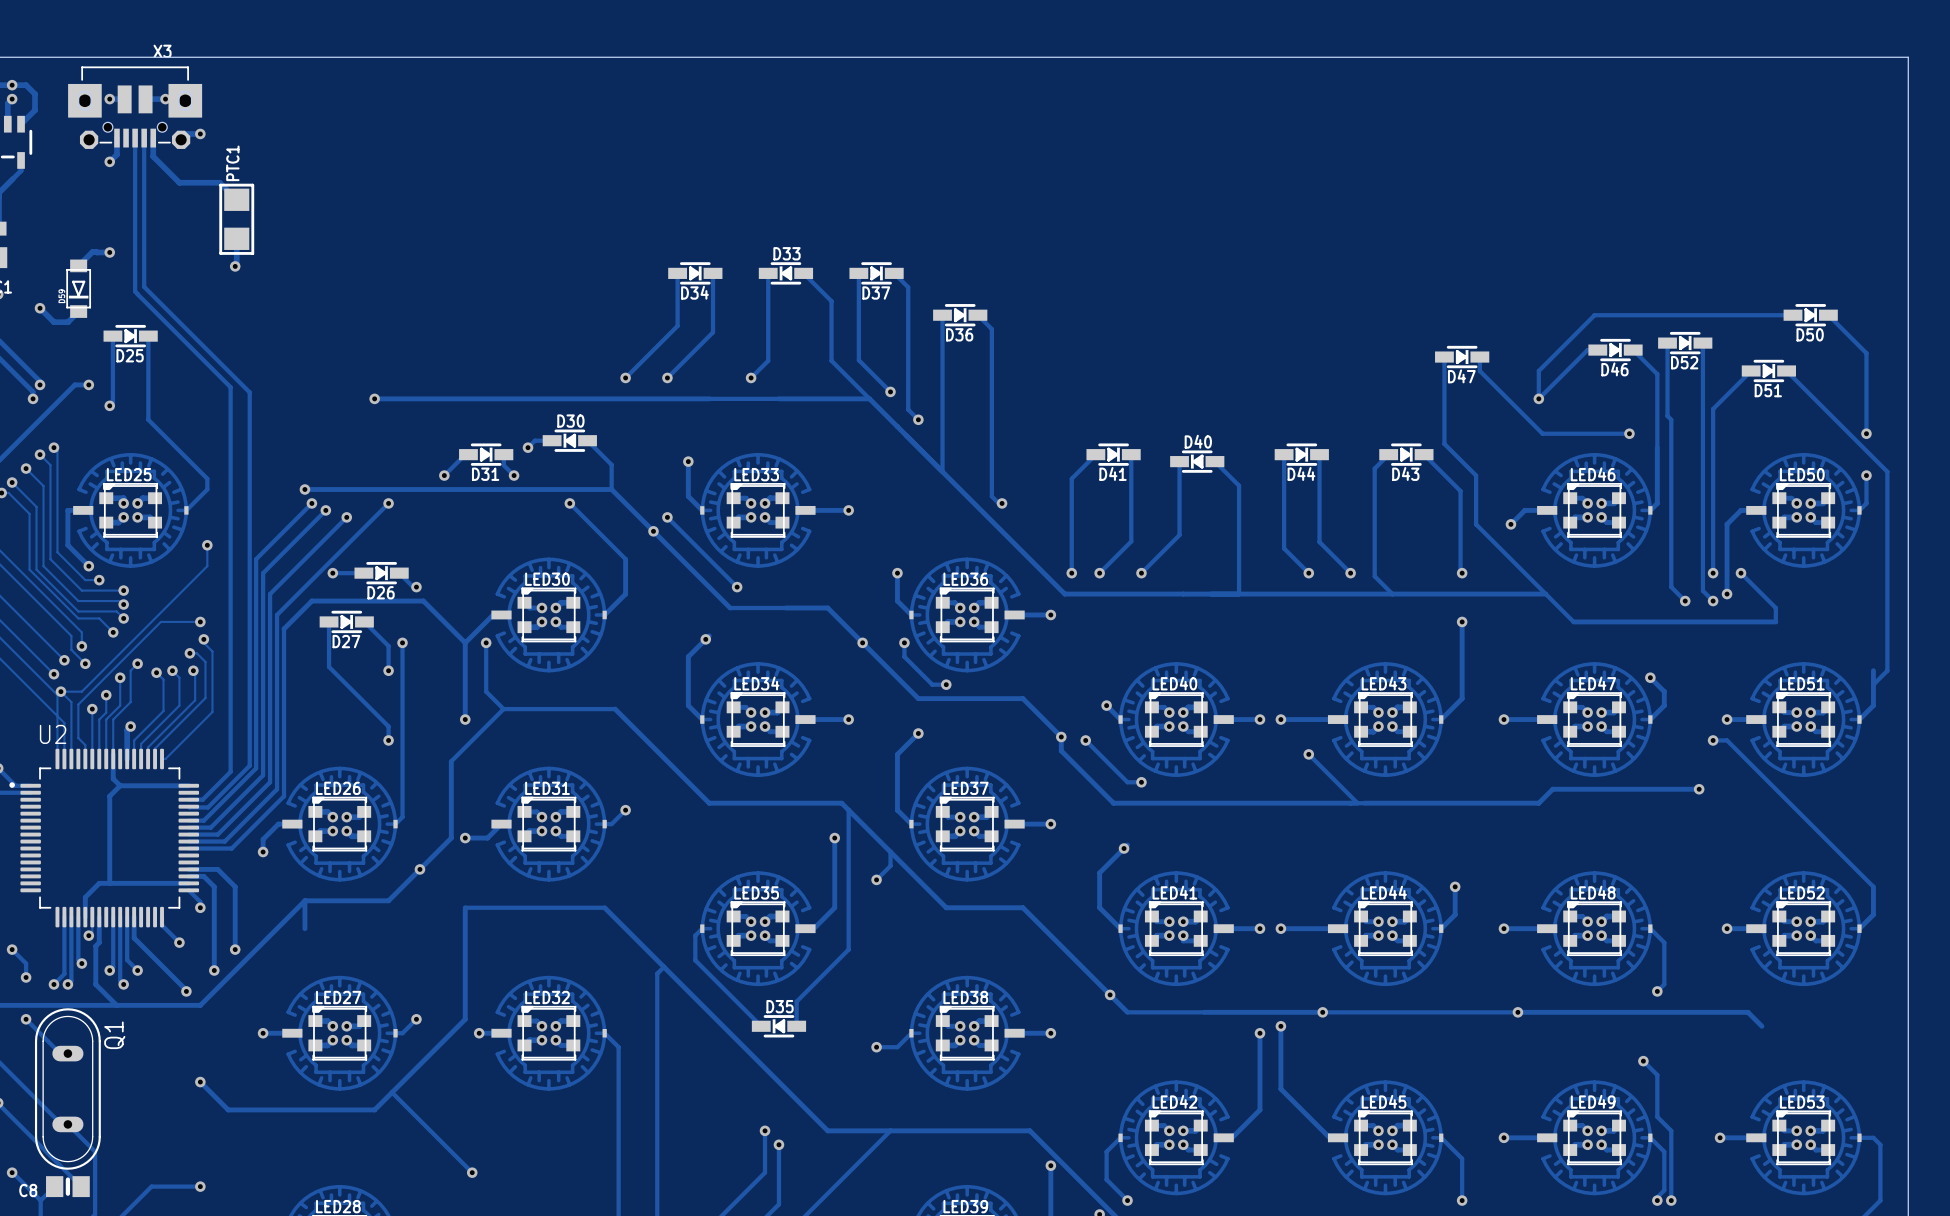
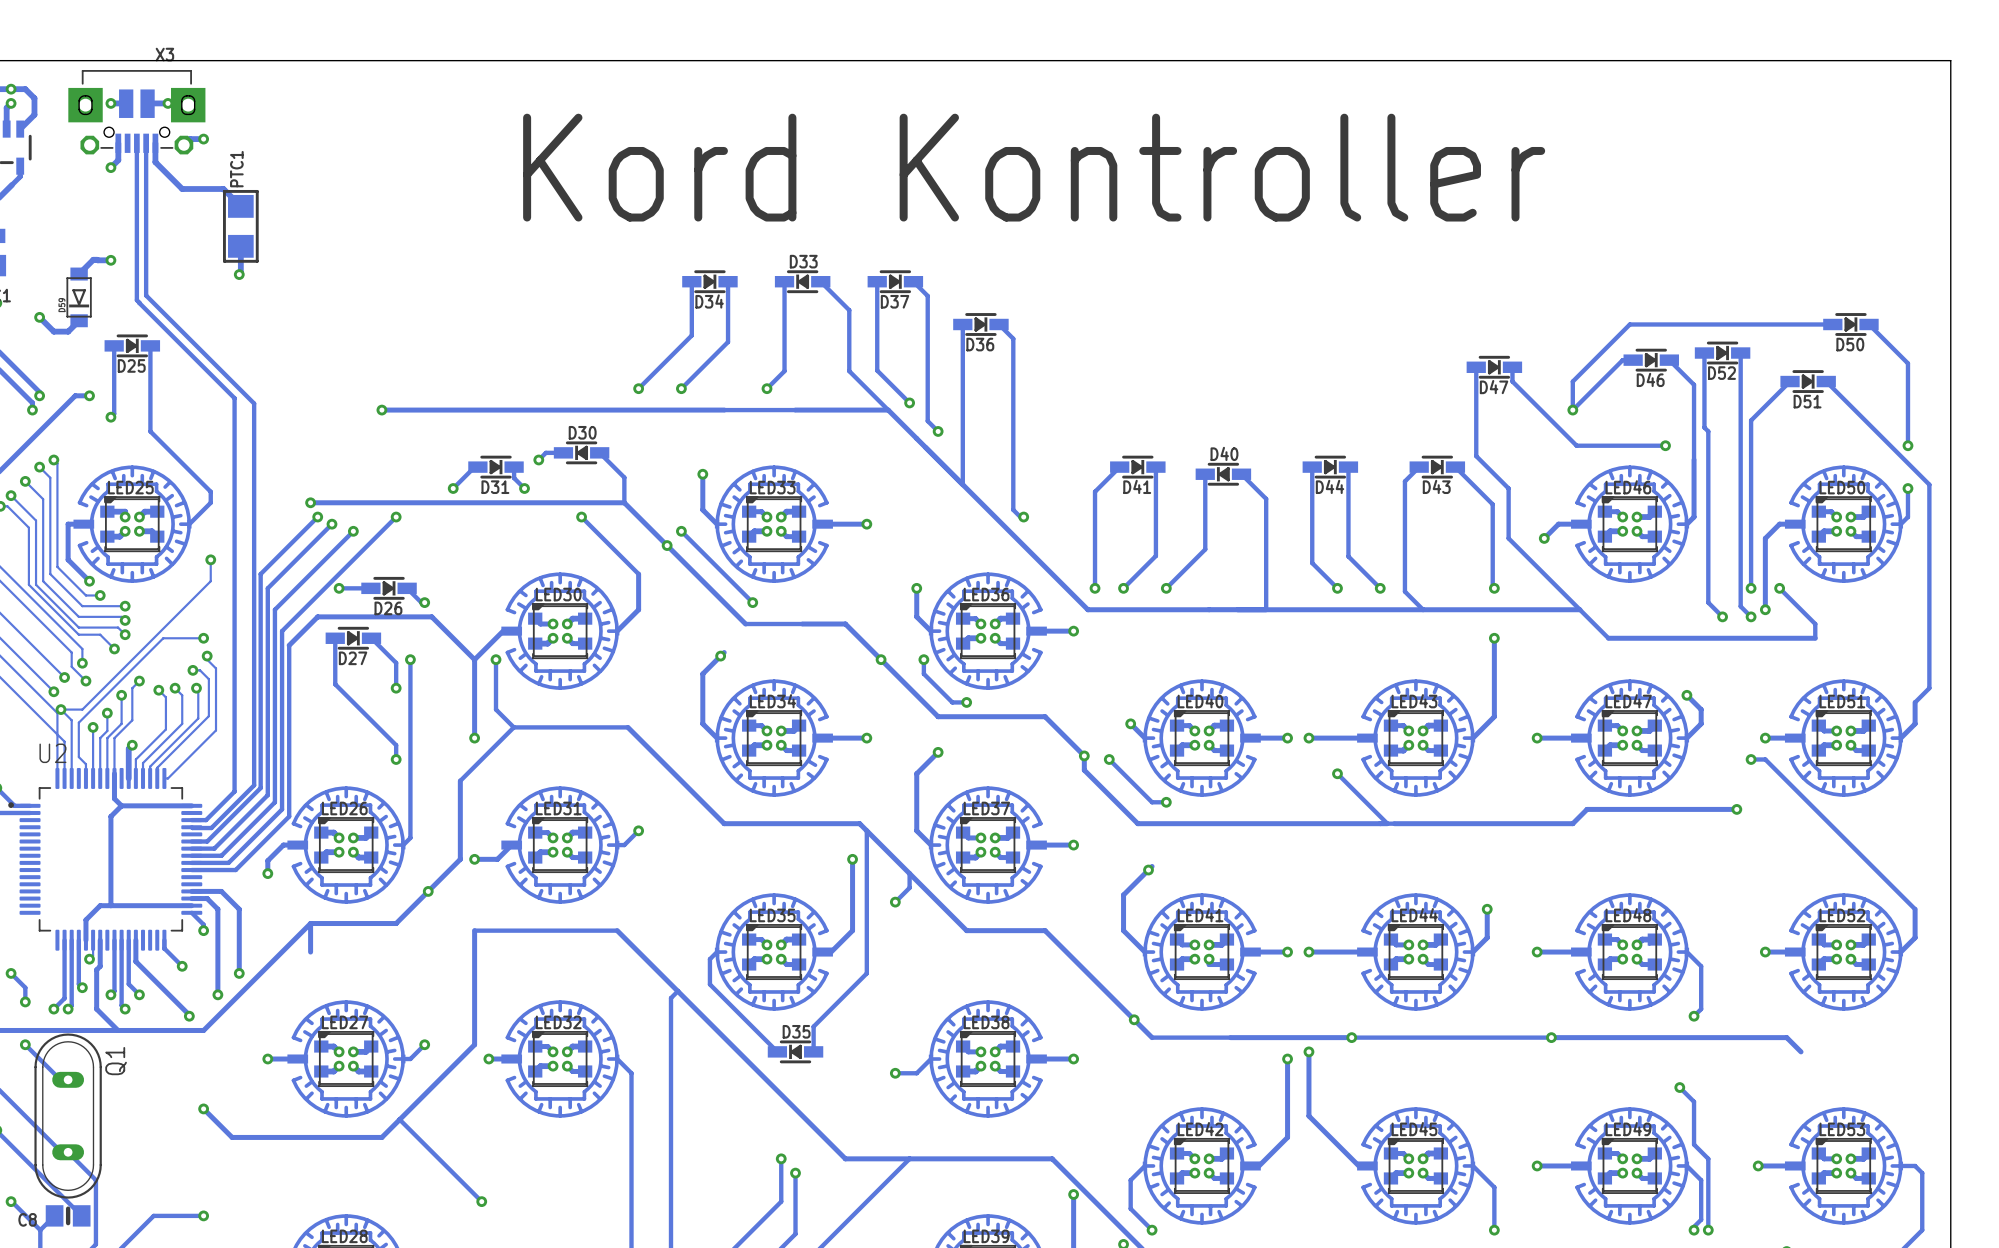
text: none -> Kord Kontroller (1034, 167)
track: (1873, 670) (1873, 684) -> none

